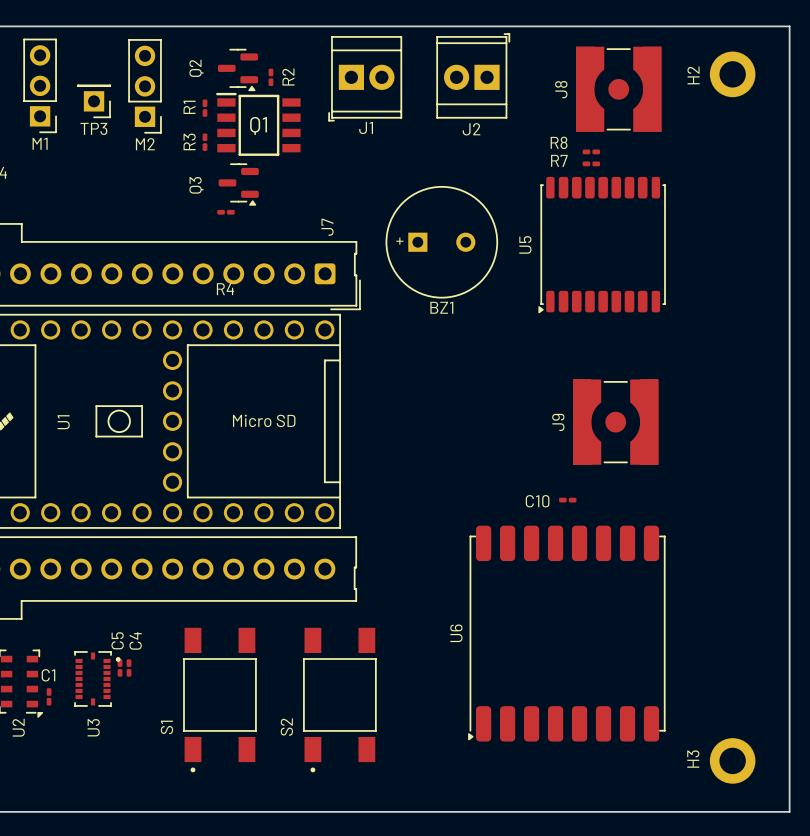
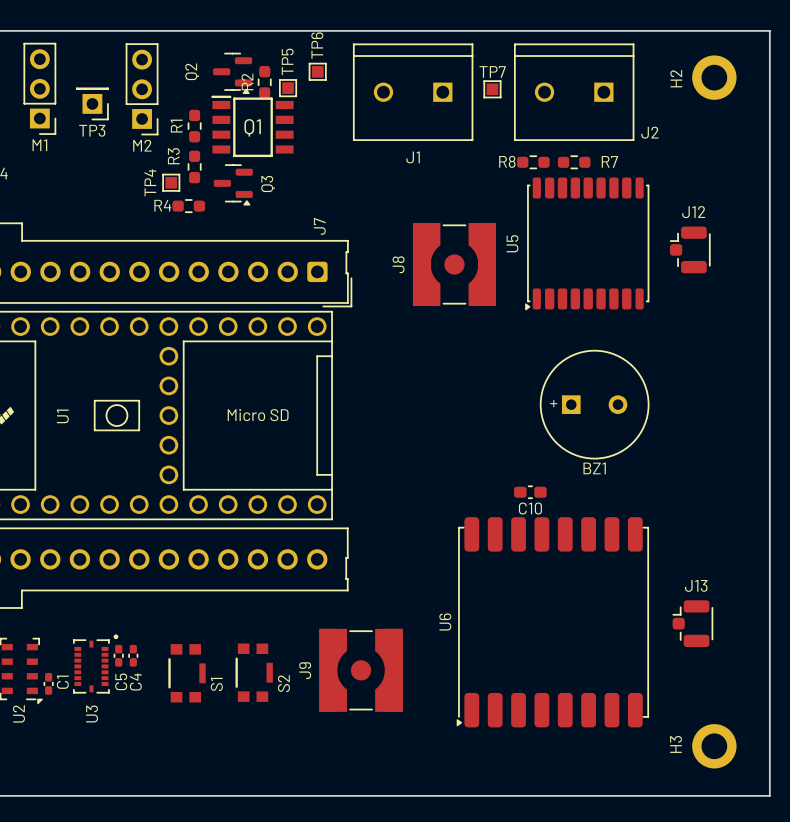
J2 footprint: [436, 33, 511, 119] -> [514, 43, 635, 141]
J1 footprint: [328, 36, 403, 122] -> [353, 43, 474, 141]
R2 footprint: [268, 68, 274, 87] -> [257, 65, 272, 99]
TP6: none -> (317, 71)
R2 name position: R2 (288, 77) -> R2 (247, 82)
TP5: none -> (288, 88)
TP7: none -> (492, 89)
J8 position: (618, 89) -> (454, 264)
R1 footprint: [202, 99, 208, 117] -> [187, 109, 202, 143]
J2 name position: J2 (471, 129) -> J2 (649, 132)
R3 footprint: [202, 133, 208, 151] -> [187, 150, 202, 184]
R8 footprint: [582, 149, 601, 155] -> [516, 155, 550, 170]
R7 name position: R7 (559, 160) -> R7 (609, 161)
R7 footprint: [582, 161, 601, 167] -> [557, 155, 591, 170]
TP4: none -> (171, 182)
Q3 name position: Q3 (196, 185) -> Q3 (268, 183)
R4 footprint: [217, 209, 235, 215] -> [172, 199, 206, 213]
BZ1 position: (441, 242) -> (594, 404)
J12: none -> (690, 249)
R4 name position: R4 (225, 289) -> R4 (162, 205)
J9 position: (615, 422) -> (361, 670)
C10 footprint: [559, 497, 577, 503] -> [514, 485, 547, 499]
C10 name position: C10 (537, 501) -> C10 (530, 508)
S1 footprint: [183, 627, 257, 773] -> [168, 644, 206, 703]
S2 footprint: [303, 627, 377, 773] -> [235, 643, 273, 702]
J13: none -> (692, 623)
C5 name position: C5 (117, 640) -> C5 (121, 681)
C4 name position: C4 (135, 640) -> C4 (135, 681)
U3 footprint: [74, 651, 121, 707] -> [73, 634, 119, 694]
C5 footprint: [117, 659, 123, 677] -> [113, 644, 124, 667]
C4 footprint: [126, 659, 132, 677] -> [128, 644, 139, 667]
C1 name position: C1 (48, 675) -> C1 (62, 682)
C1 footprint: [46, 688, 52, 706] -> [43, 672, 54, 695]
S1 name position: S1 (166, 727) -> S1 (216, 684)
S2 name position: S2 (286, 727) -> S2 (283, 683)

